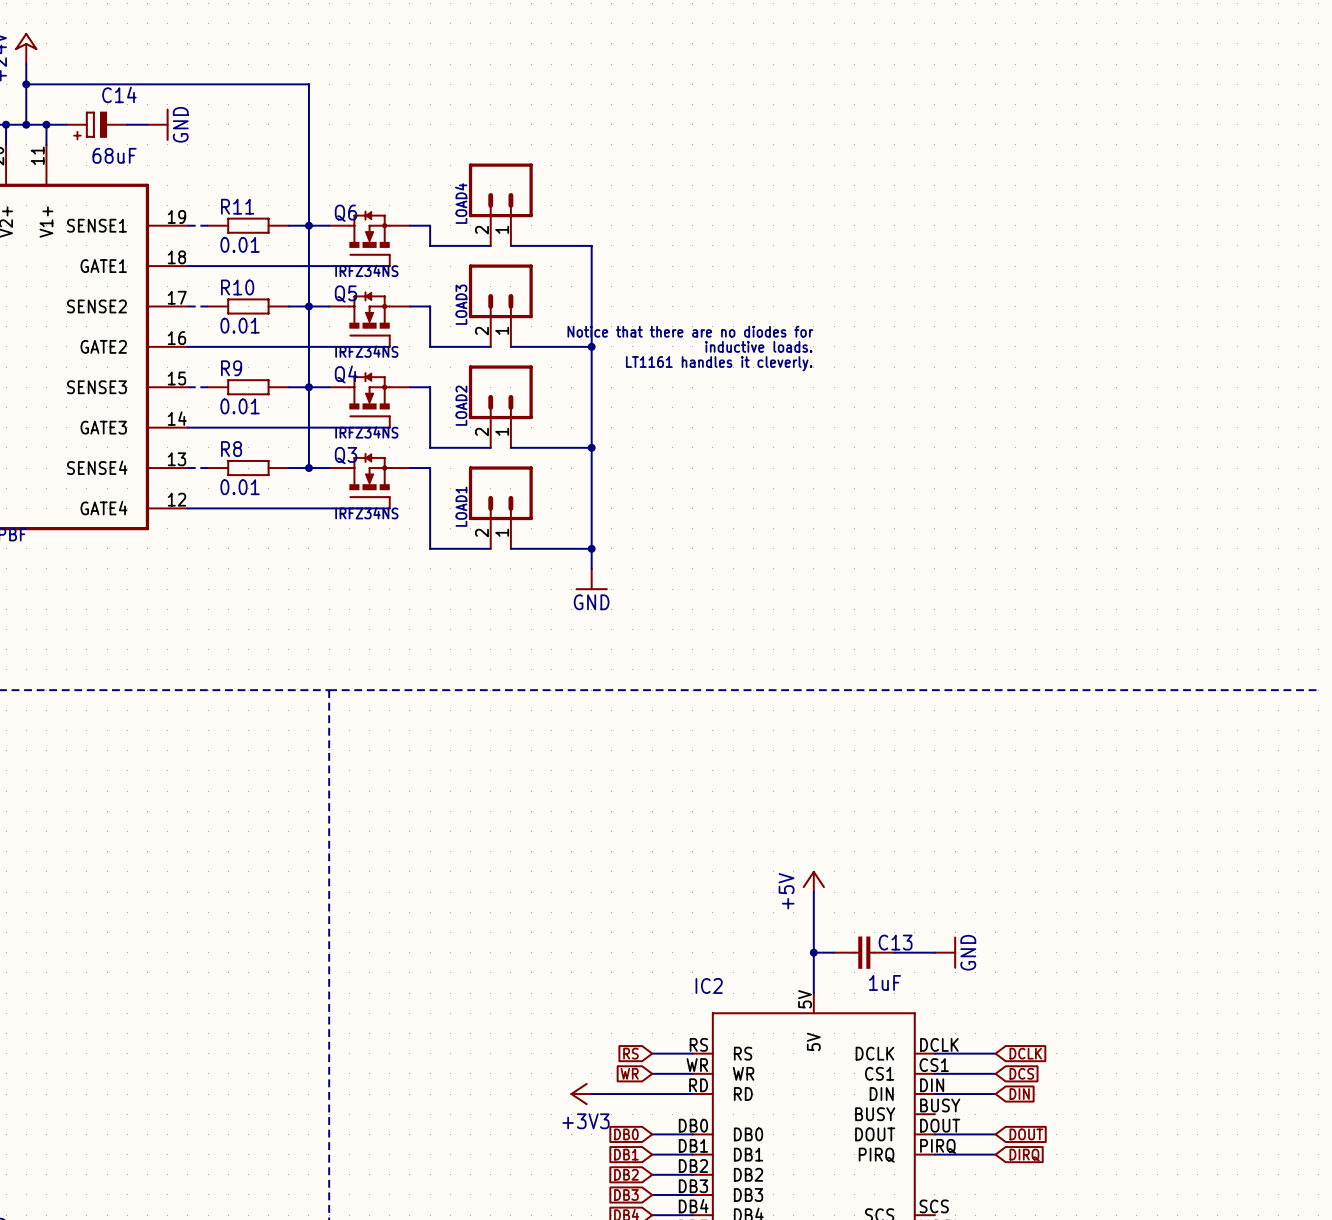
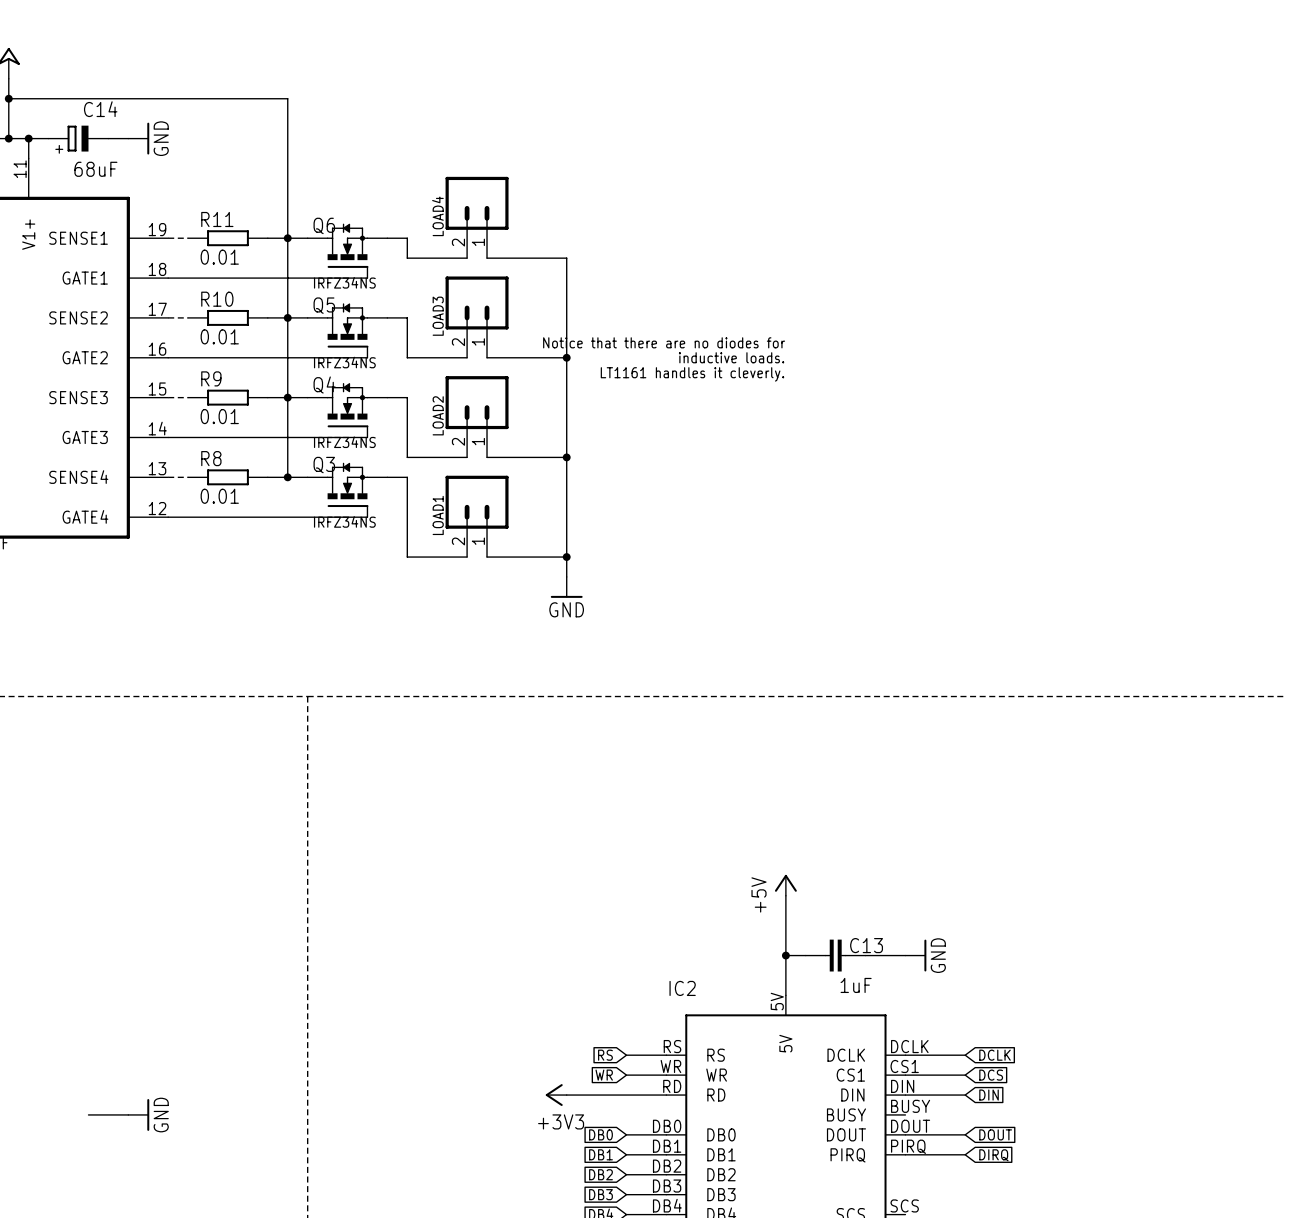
wire: none -> (88, 1114) (128, 1114)
power symbol: none -> GND (138, 1114)

